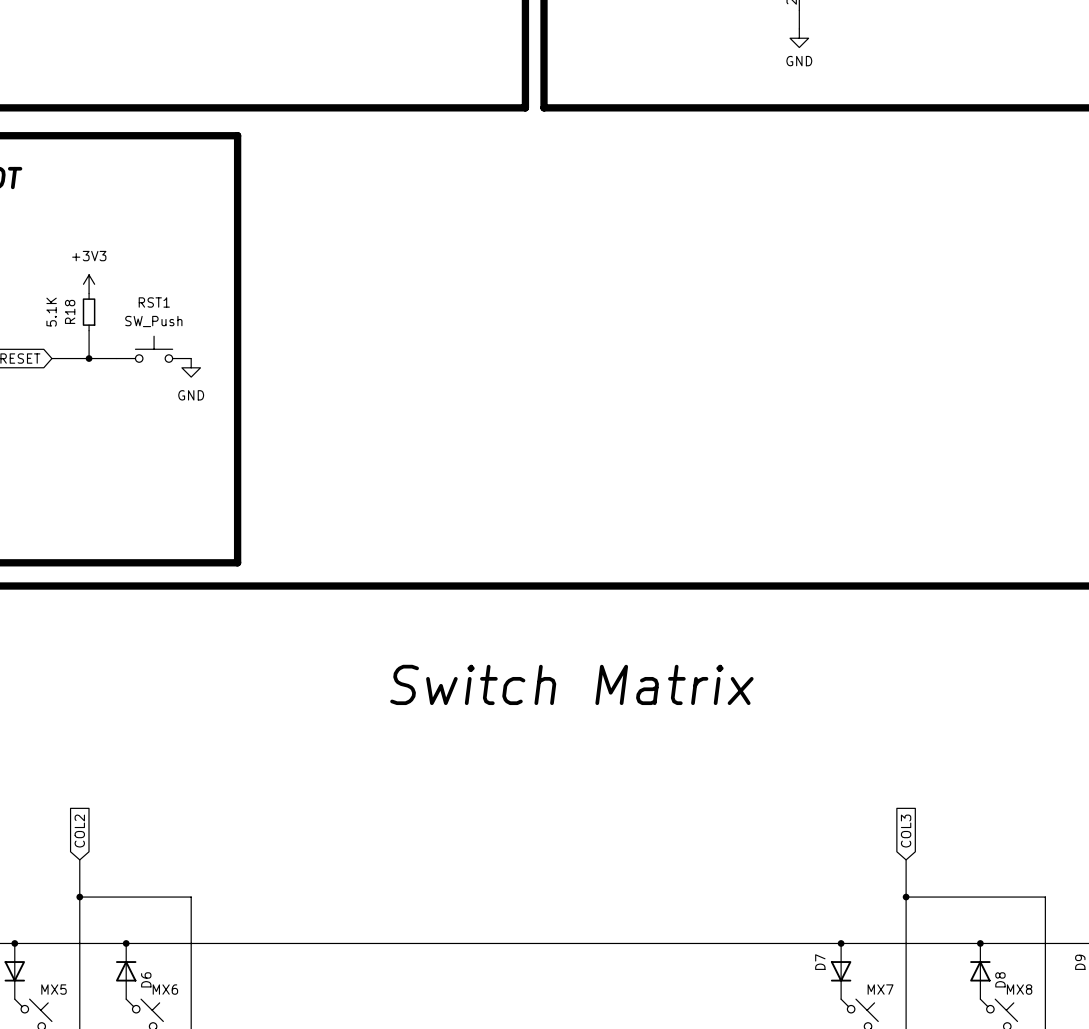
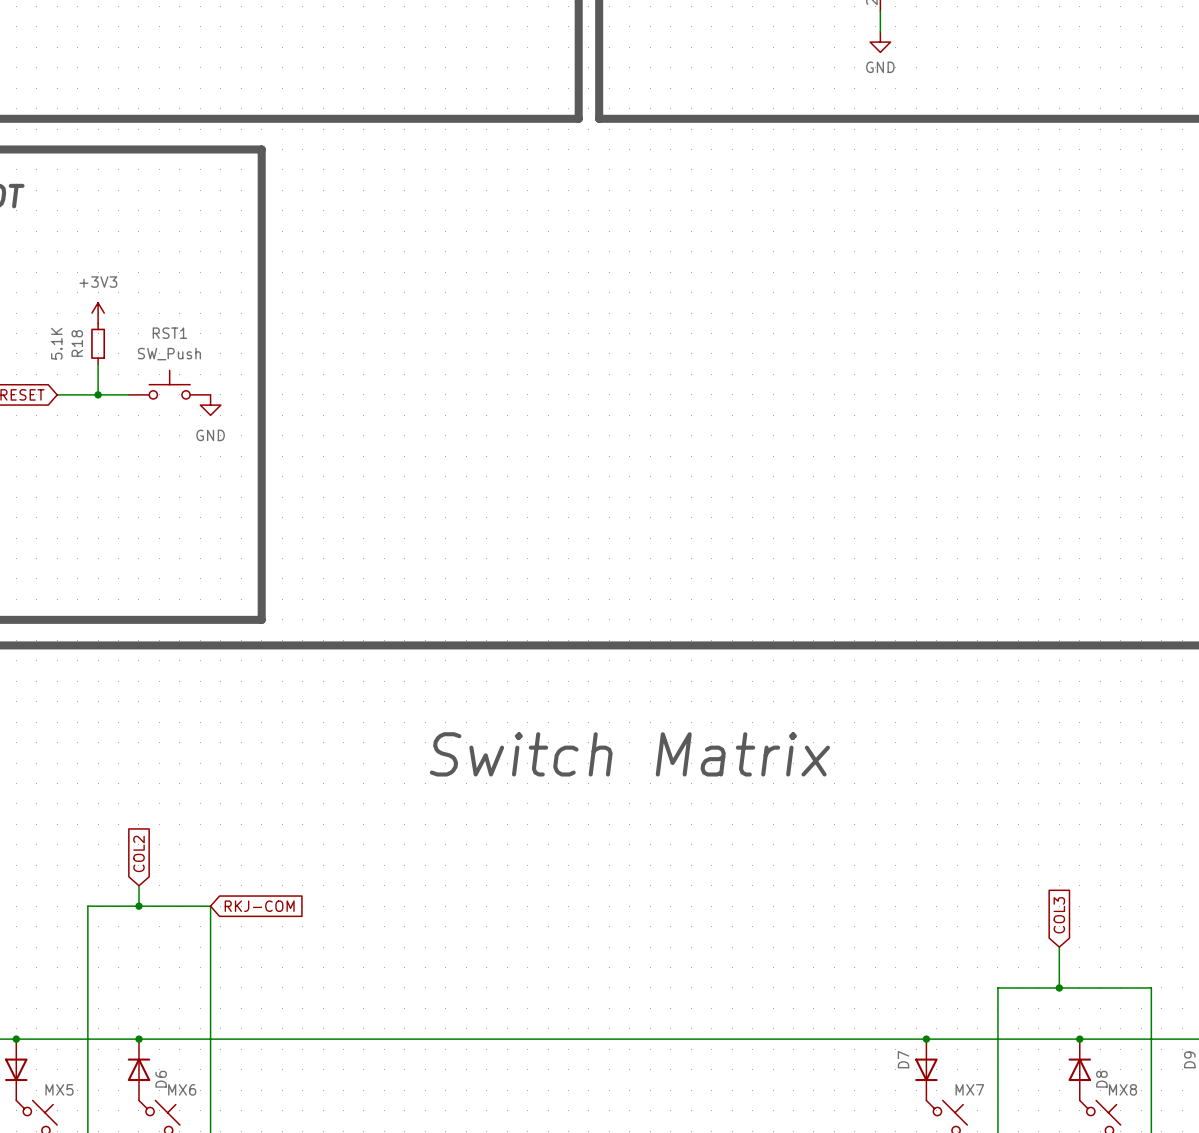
wire: none -> (138, 885) (138, 906)
junction: none -> (138, 906)
global label: none -> RKJ-COM (259, 906)
global label position: COL2 (79, 831) -> COL2 (138, 853)
global label position: COL3 (906, 831) -> COL3 (1059, 915)
wire: (906, 859) (906, 897) -> (1059, 947) (1059, 987)
wire: (79, 897) (191, 897) -> (87, 947) (87, 906) (210, 906) (210, 987)
junction: (79, 897) -> none
junction: (906, 897) -> none
junction: none -> (1059, 987)

